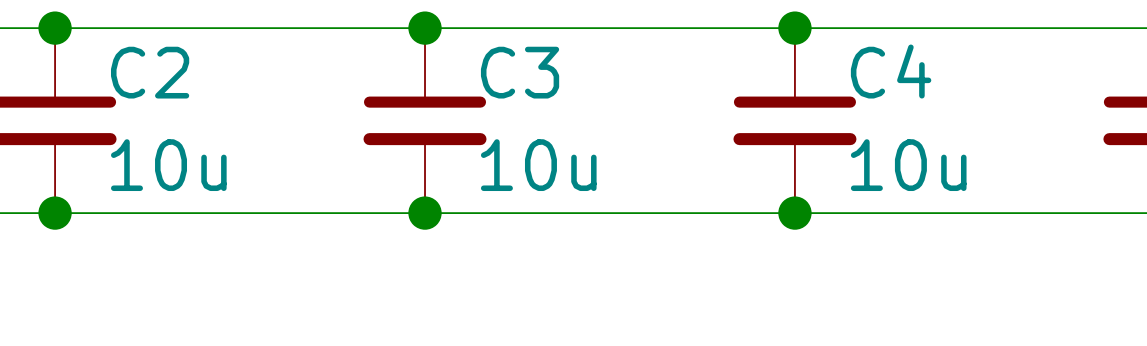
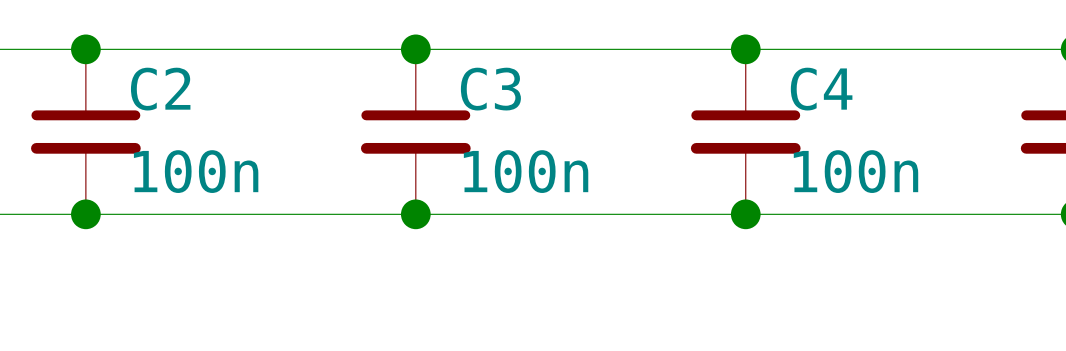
C2 value: 10u (168, 165) -> 100n (196, 171)
C3 value: 10u (538, 165) -> 100n (526, 171)
C4 value: 10u (908, 165) -> 100n (855, 171)

